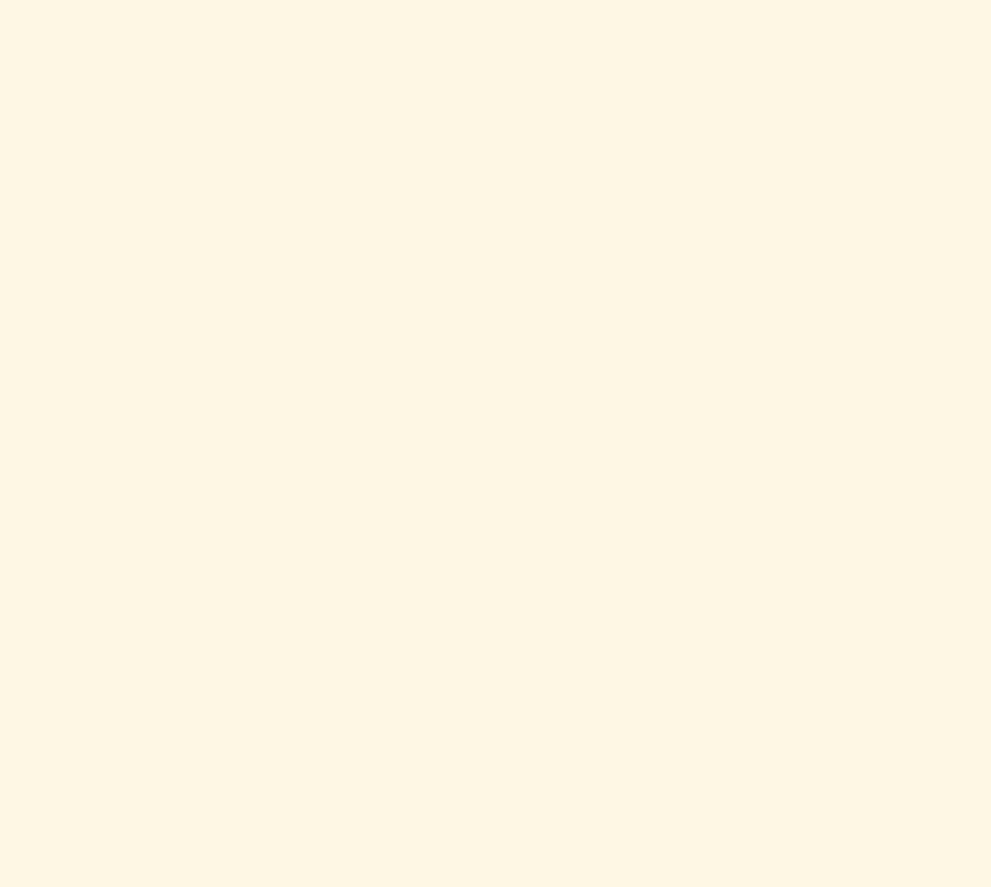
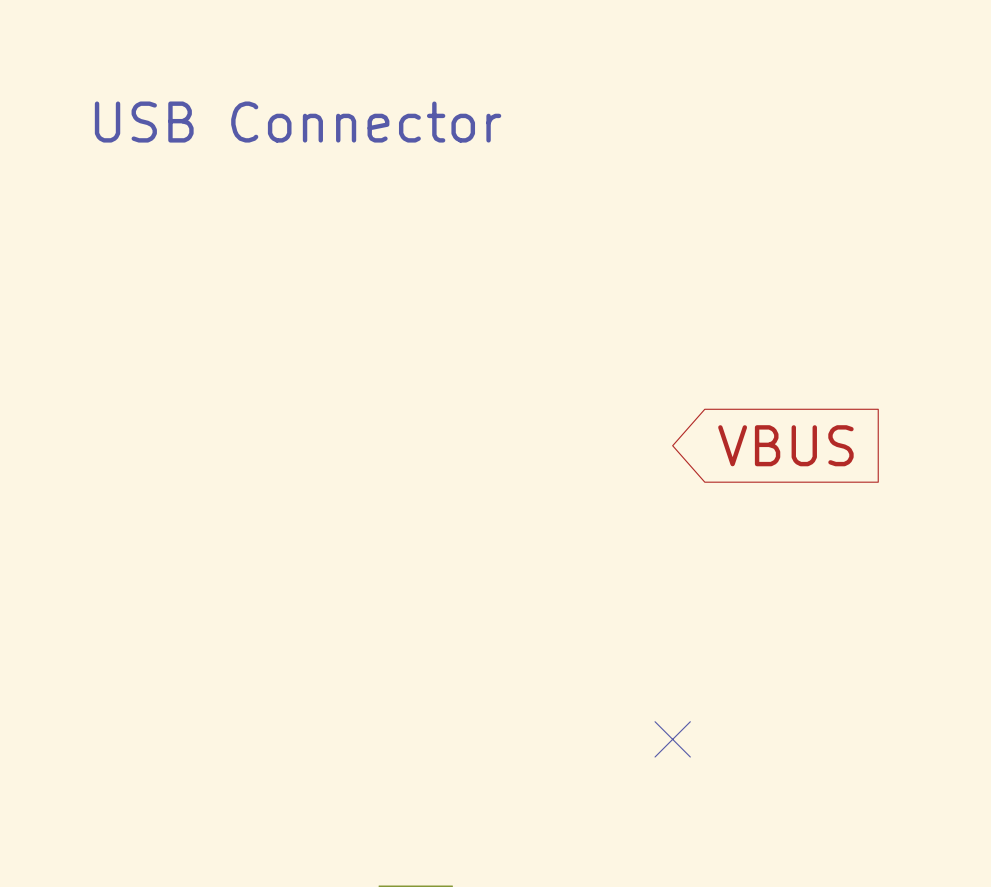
text: none -> USB Connector (298, 122)
global label: none -> VBUS (785, 445)
no-connect mark: none -> (672, 739)
wire: none -> (379, 886) (452, 886)

